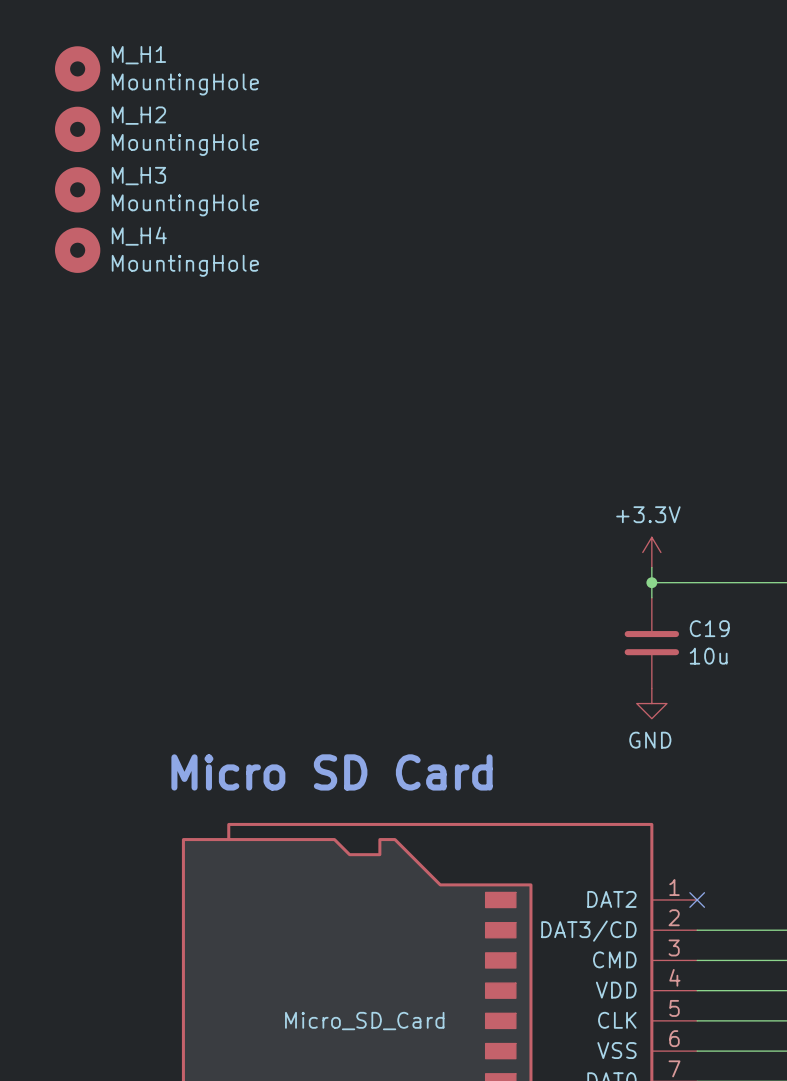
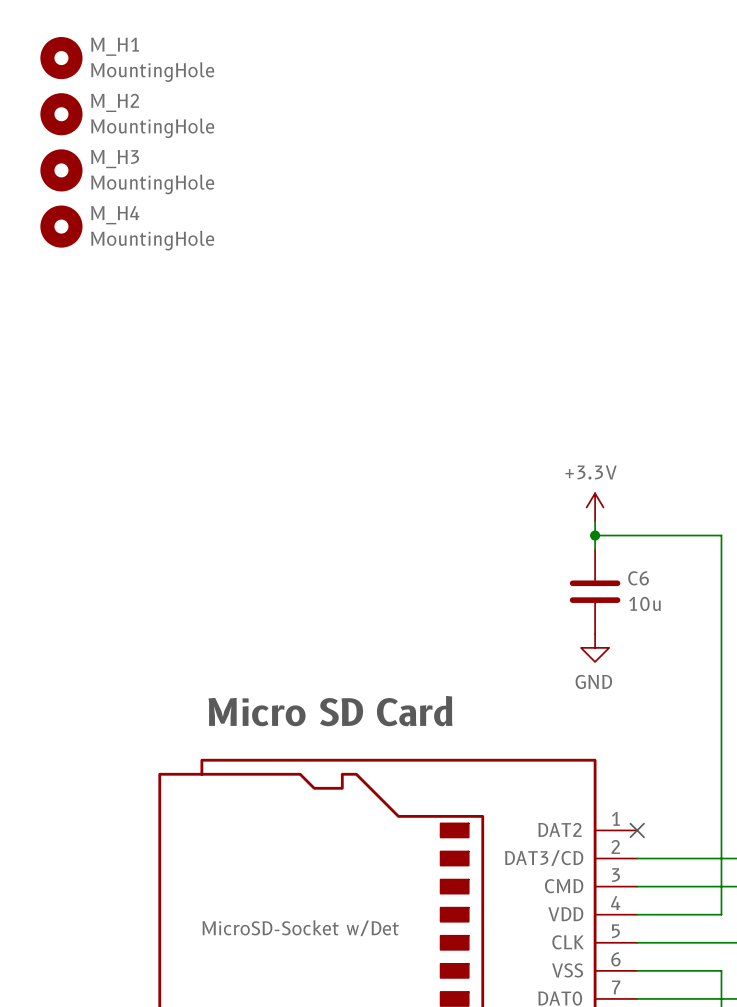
C19 name: C19 (709, 628) -> C6 (638, 578)
part value: Micro_SD_Card (364, 1021) -> MicroSD-Socket w/Det (300, 928)

